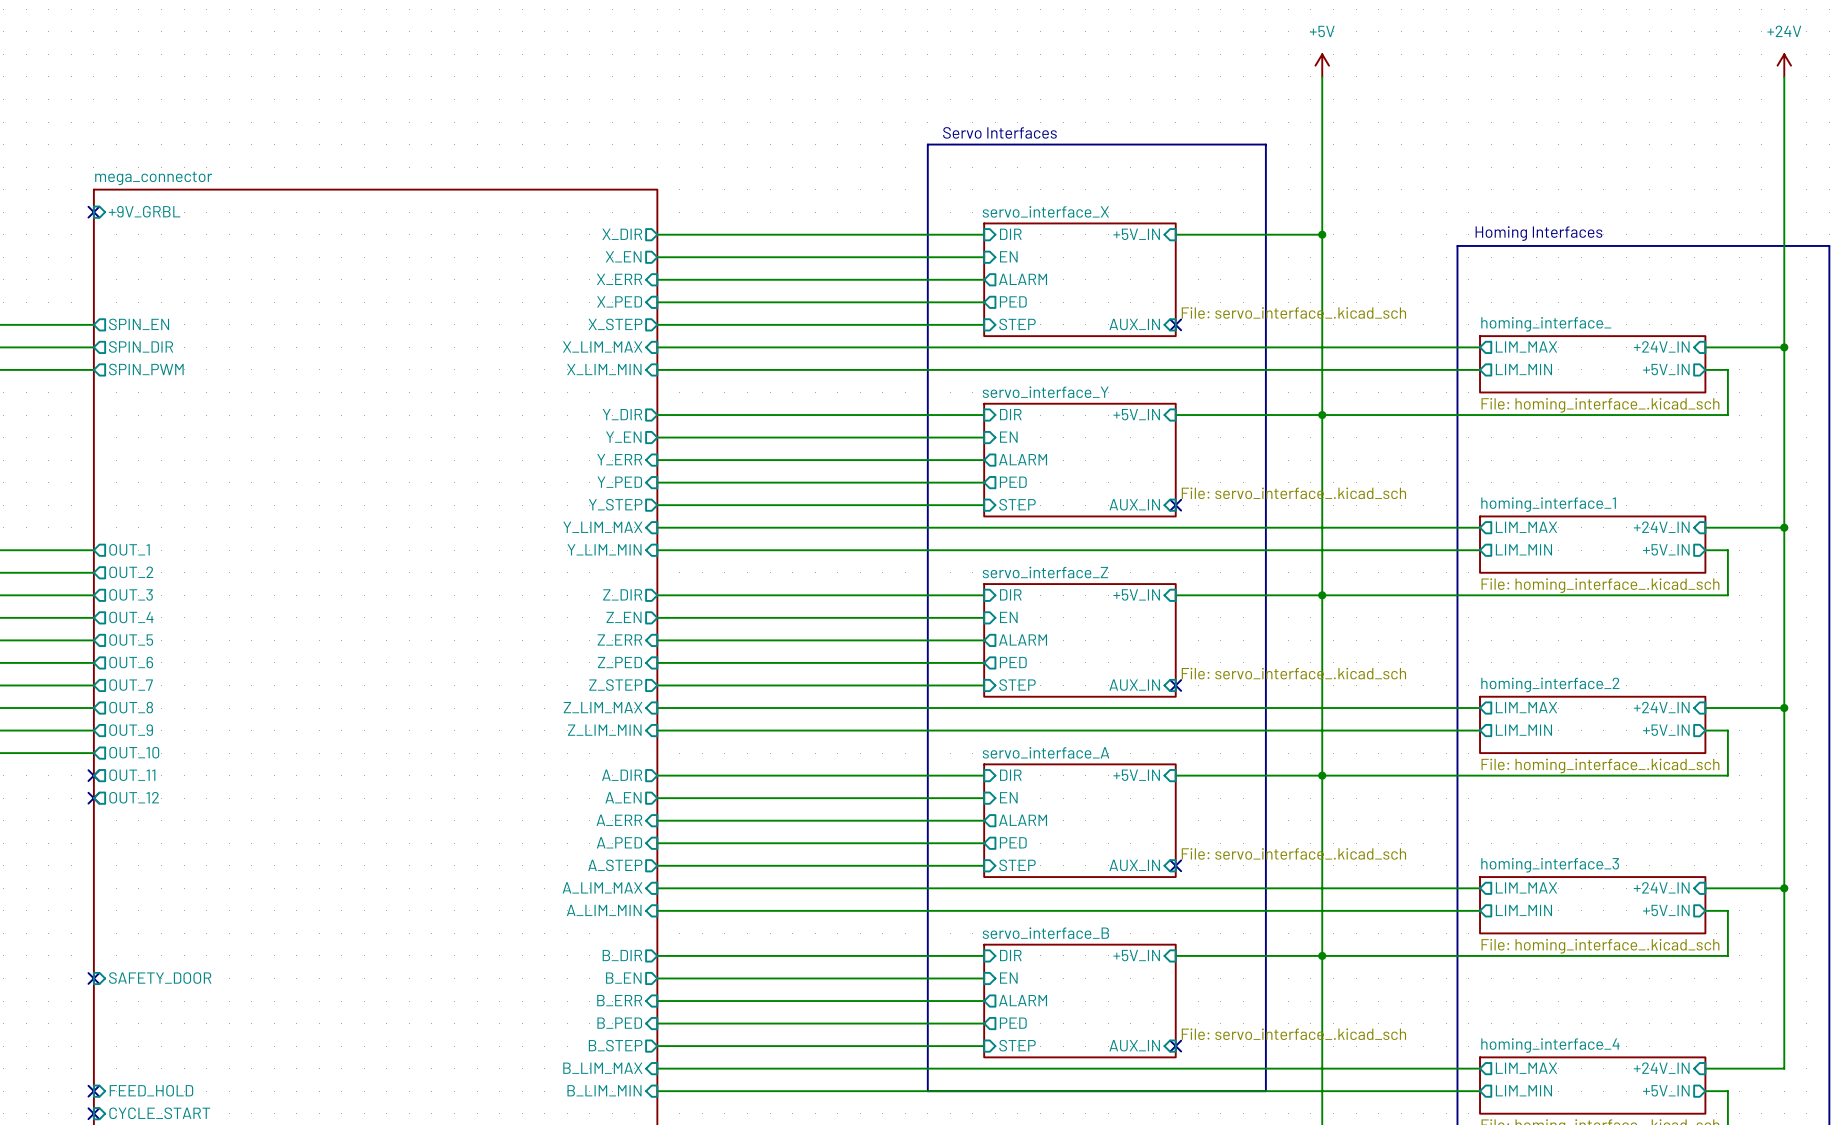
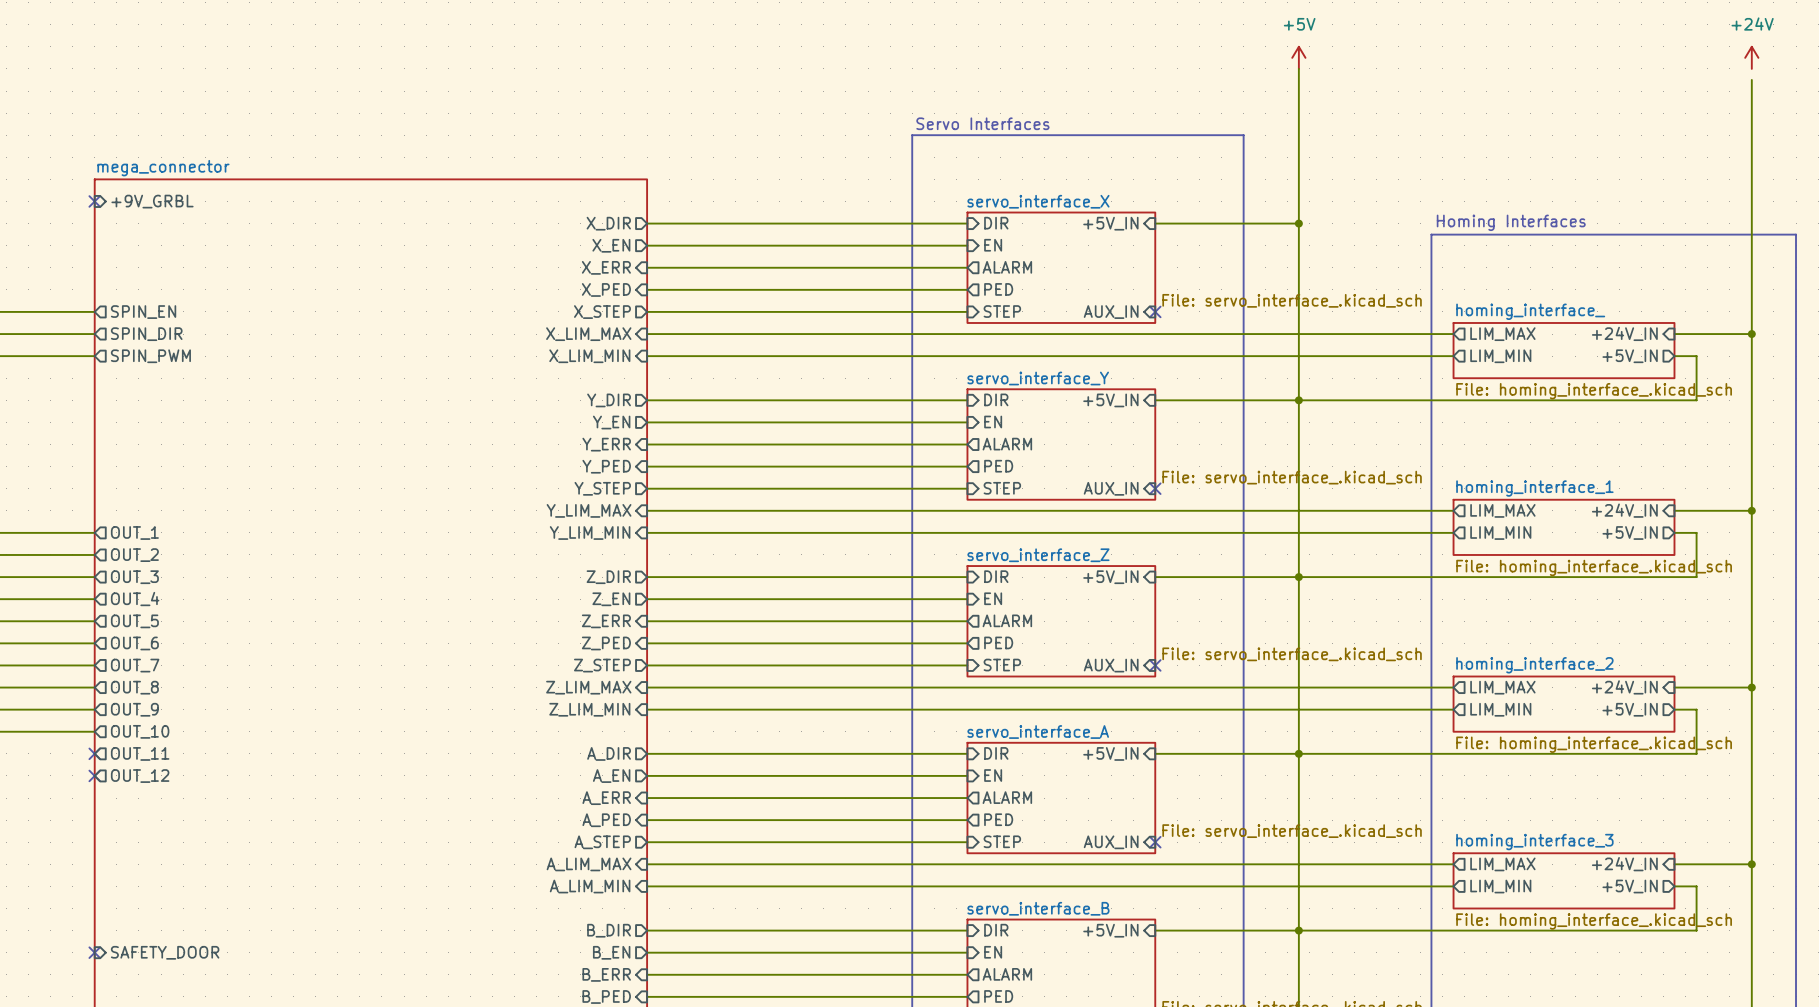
wire: (1784, 76) (1784, 88) -> none

